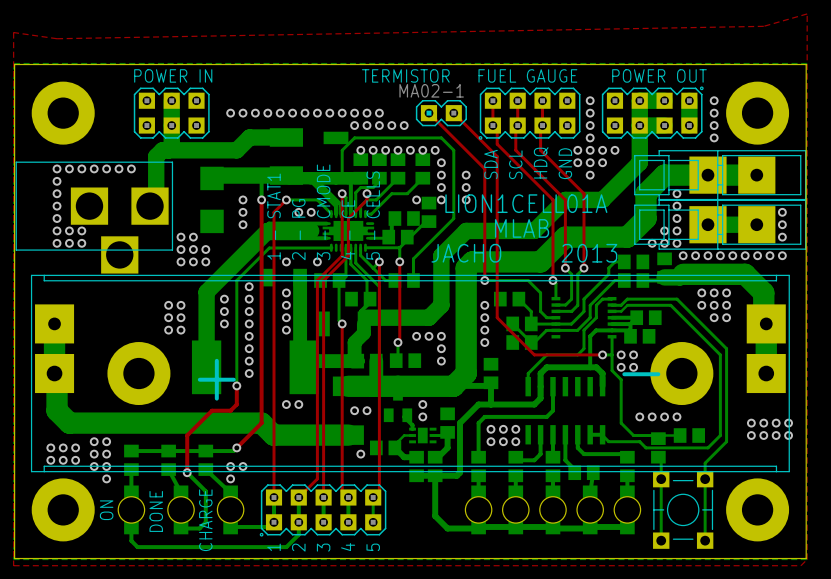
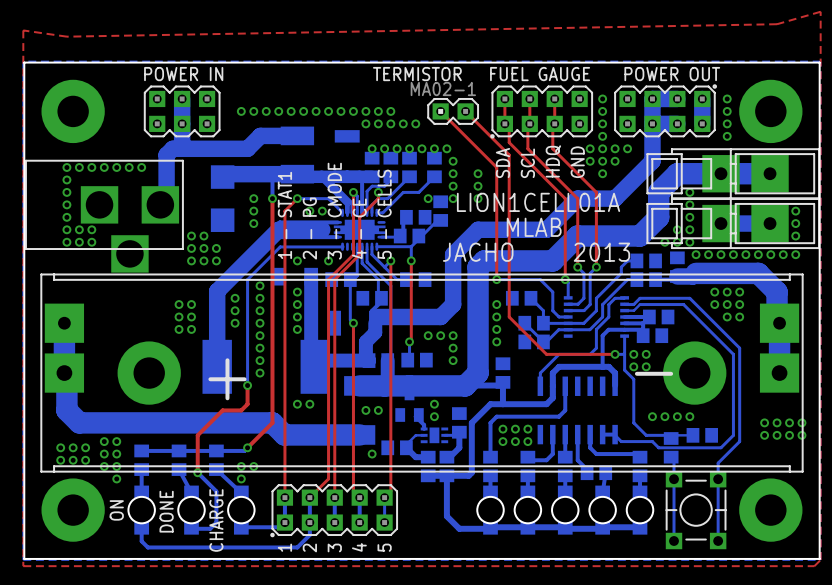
bottom track: (342, 175) (342, 150) (354, 137) (441, 137) (453, 150) (453, 218) (413, 258) (413, 280) -> none

